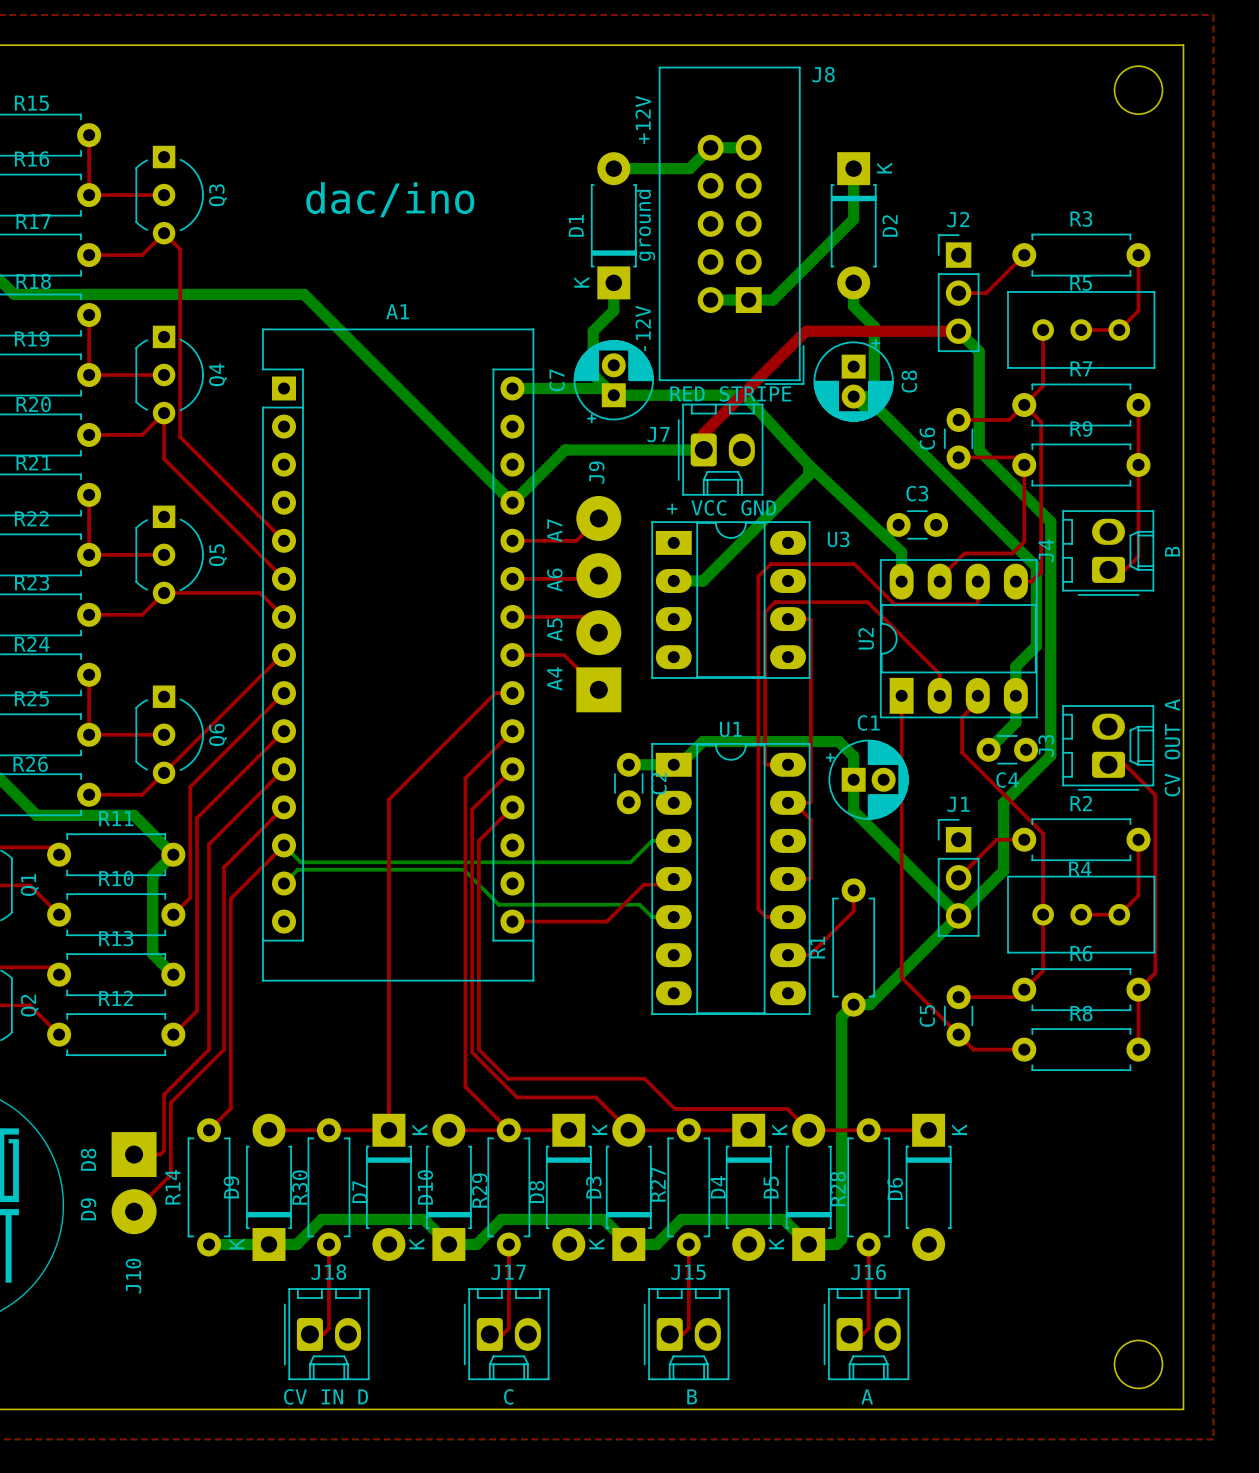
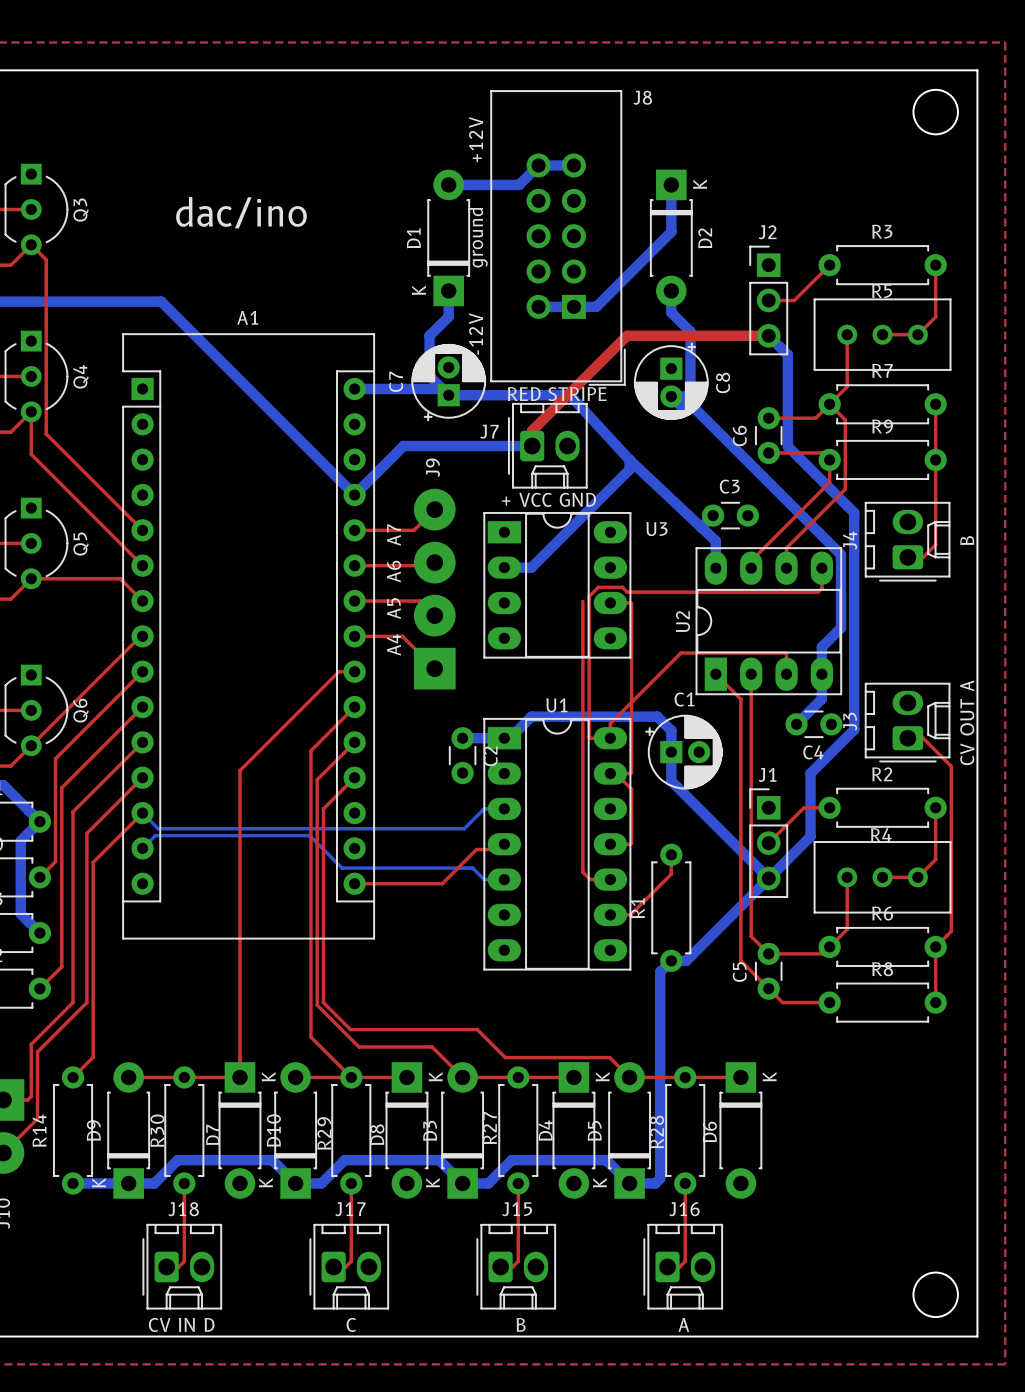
top track: (1024, 489) (1024, 541) (1012, 553) (964, 553) (939, 578) -> (829, 482) (751, 560) (751, 565)
top track: (1041, 496) (1041, 572) (1031, 581) (1015, 581) -> (845, 489) (786, 548) (786, 568)
top track: (977, 581) (976, 604) (894, 604) (854, 564) (770, 564) (758, 576) (758, 617) -> none
top track: (800, 602) (867, 602) (939, 674) (939, 695) -> (622, 587) (627, 592) (818, 592) (821, 588) (821, 568)
top track: (901, 695) (901, 977) (928, 1004) -> (715, 674) (740, 699) (740, 960)
top track: none -> (751, 674) (751, 936) (768, 953)
top track: none -> (786, 674) (785, 652) (680, 652) (610, 723) (610, 738)
top track: (977, 701) (962, 717) (962, 752) (1043, 833) (1043, 914) -> none

